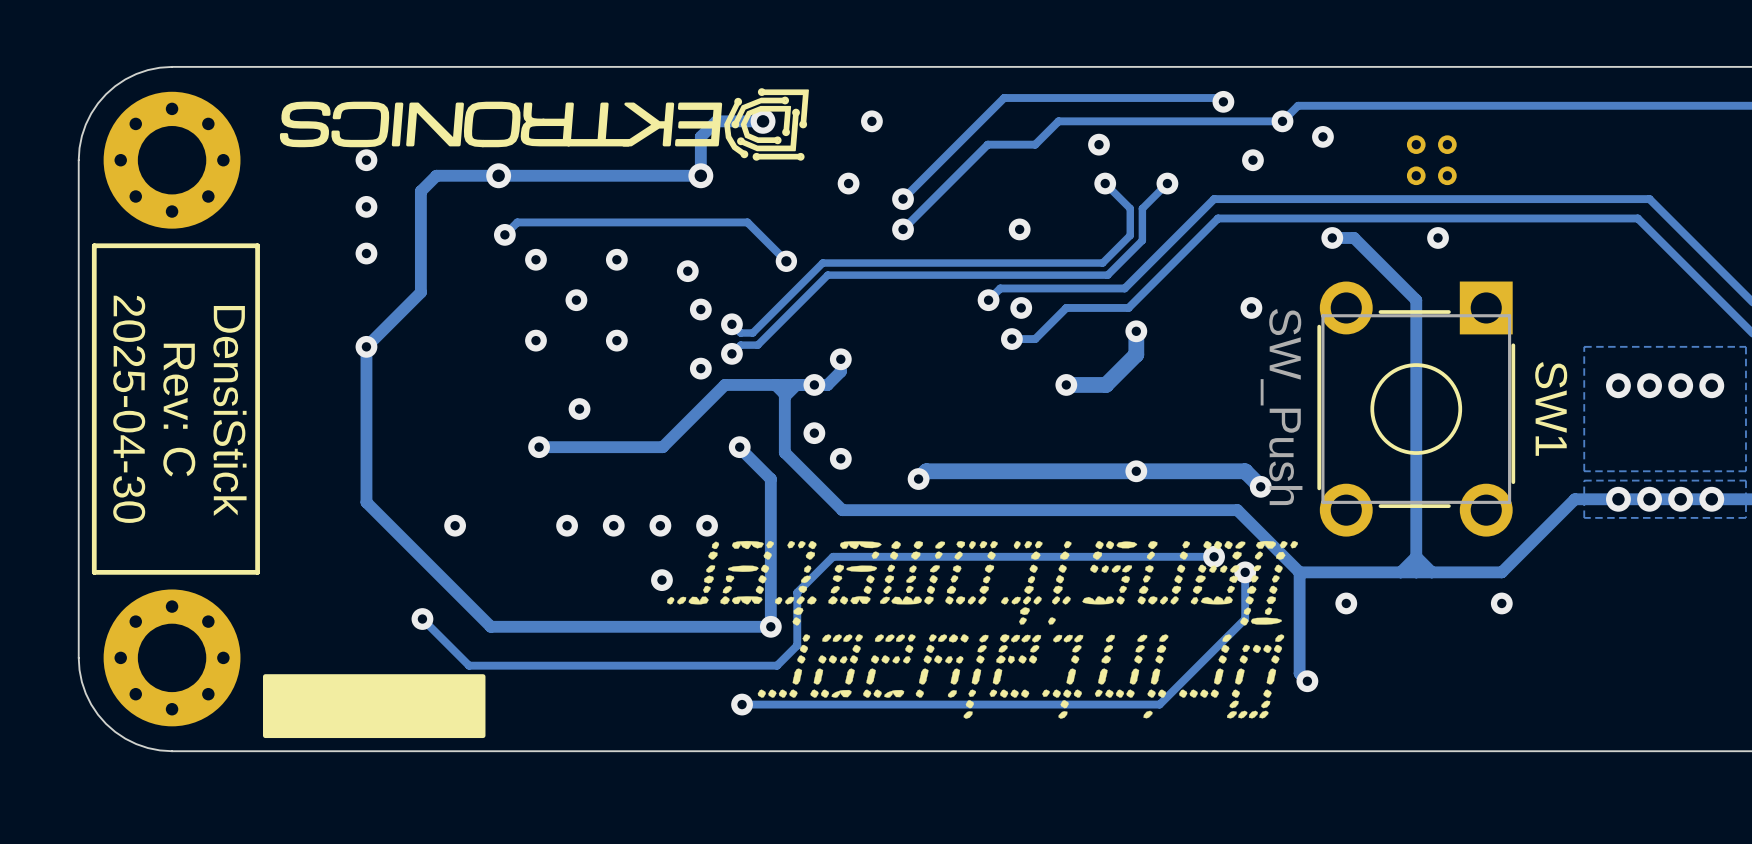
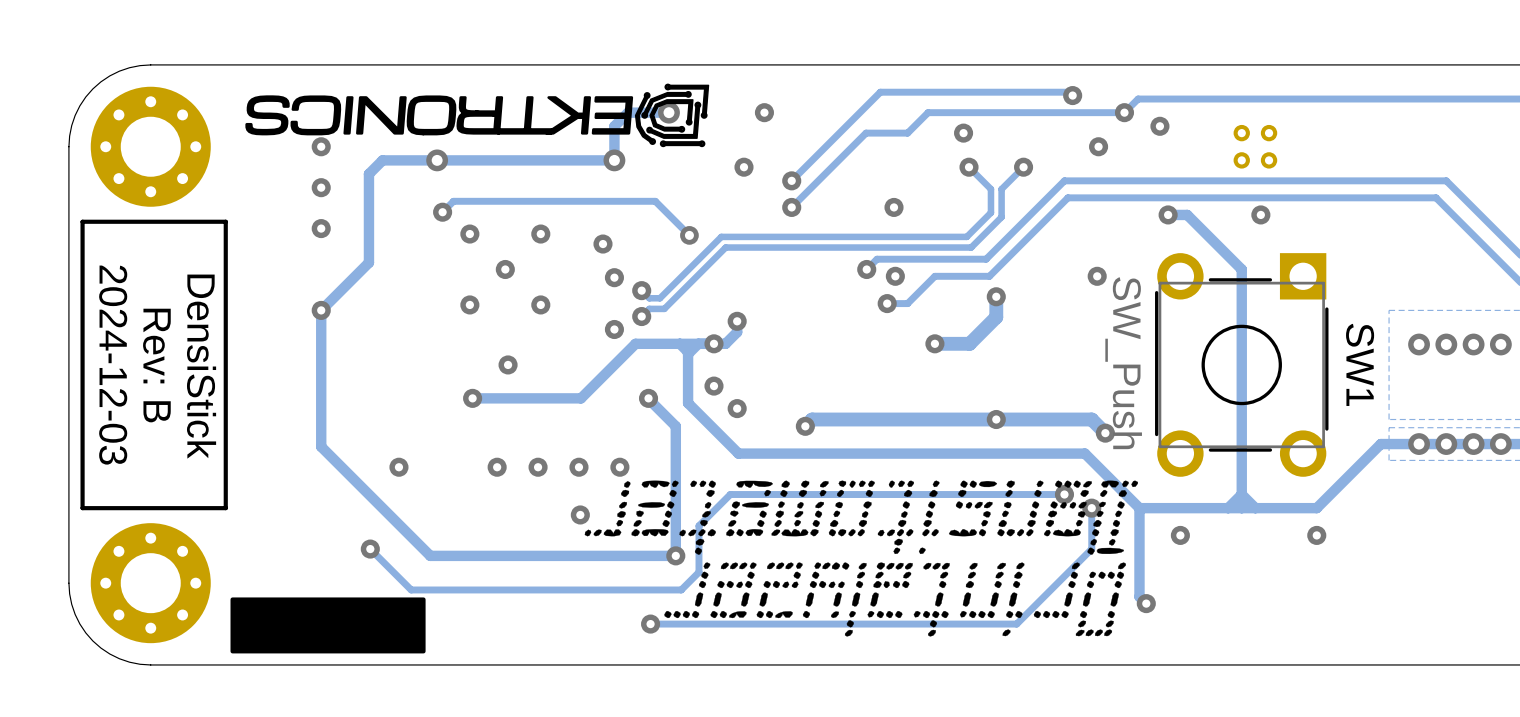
text: 2025-04-30 (129, 409) -> 2024-12-03 (113, 365)
text: Rev: C (179, 410) -> Rev: B (156, 365)

